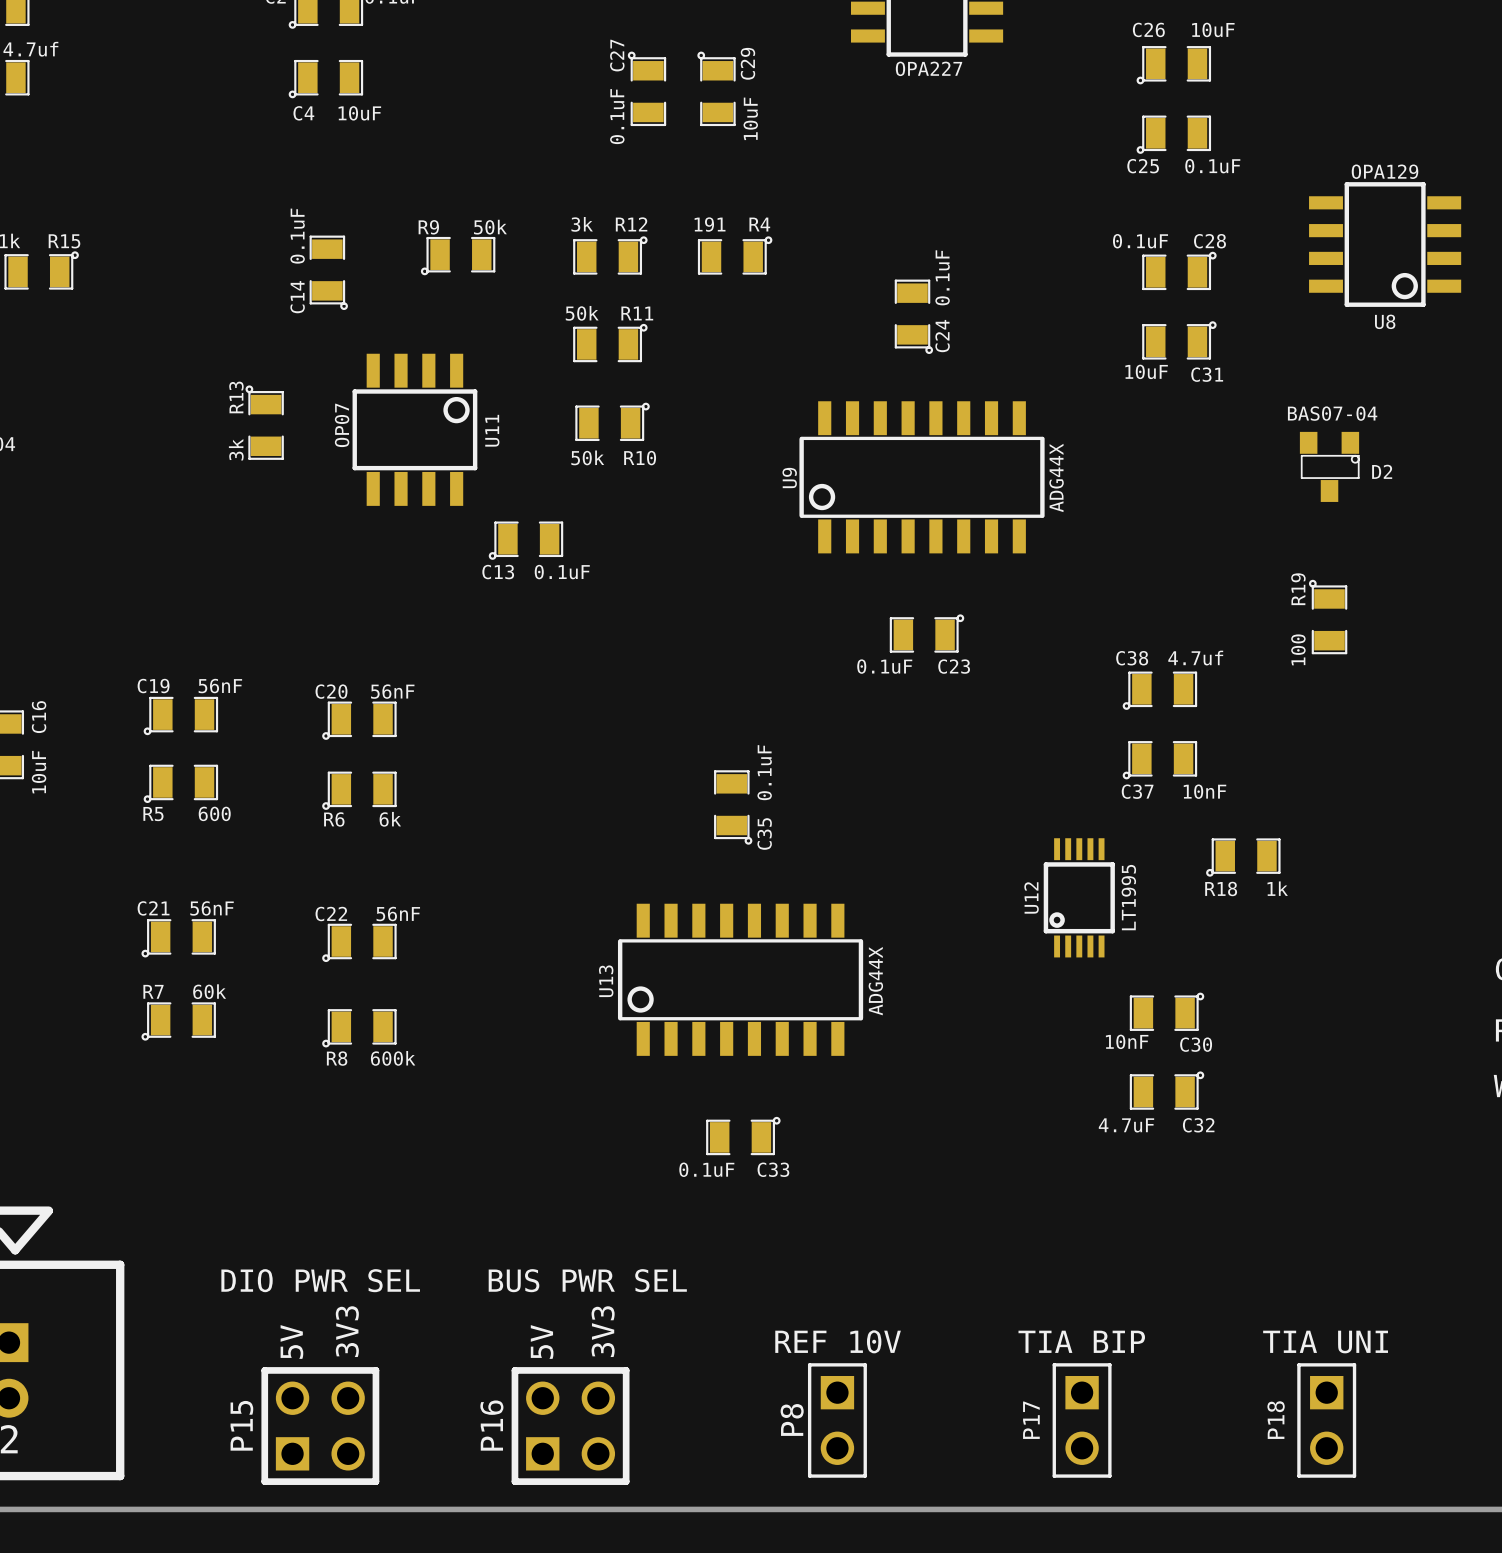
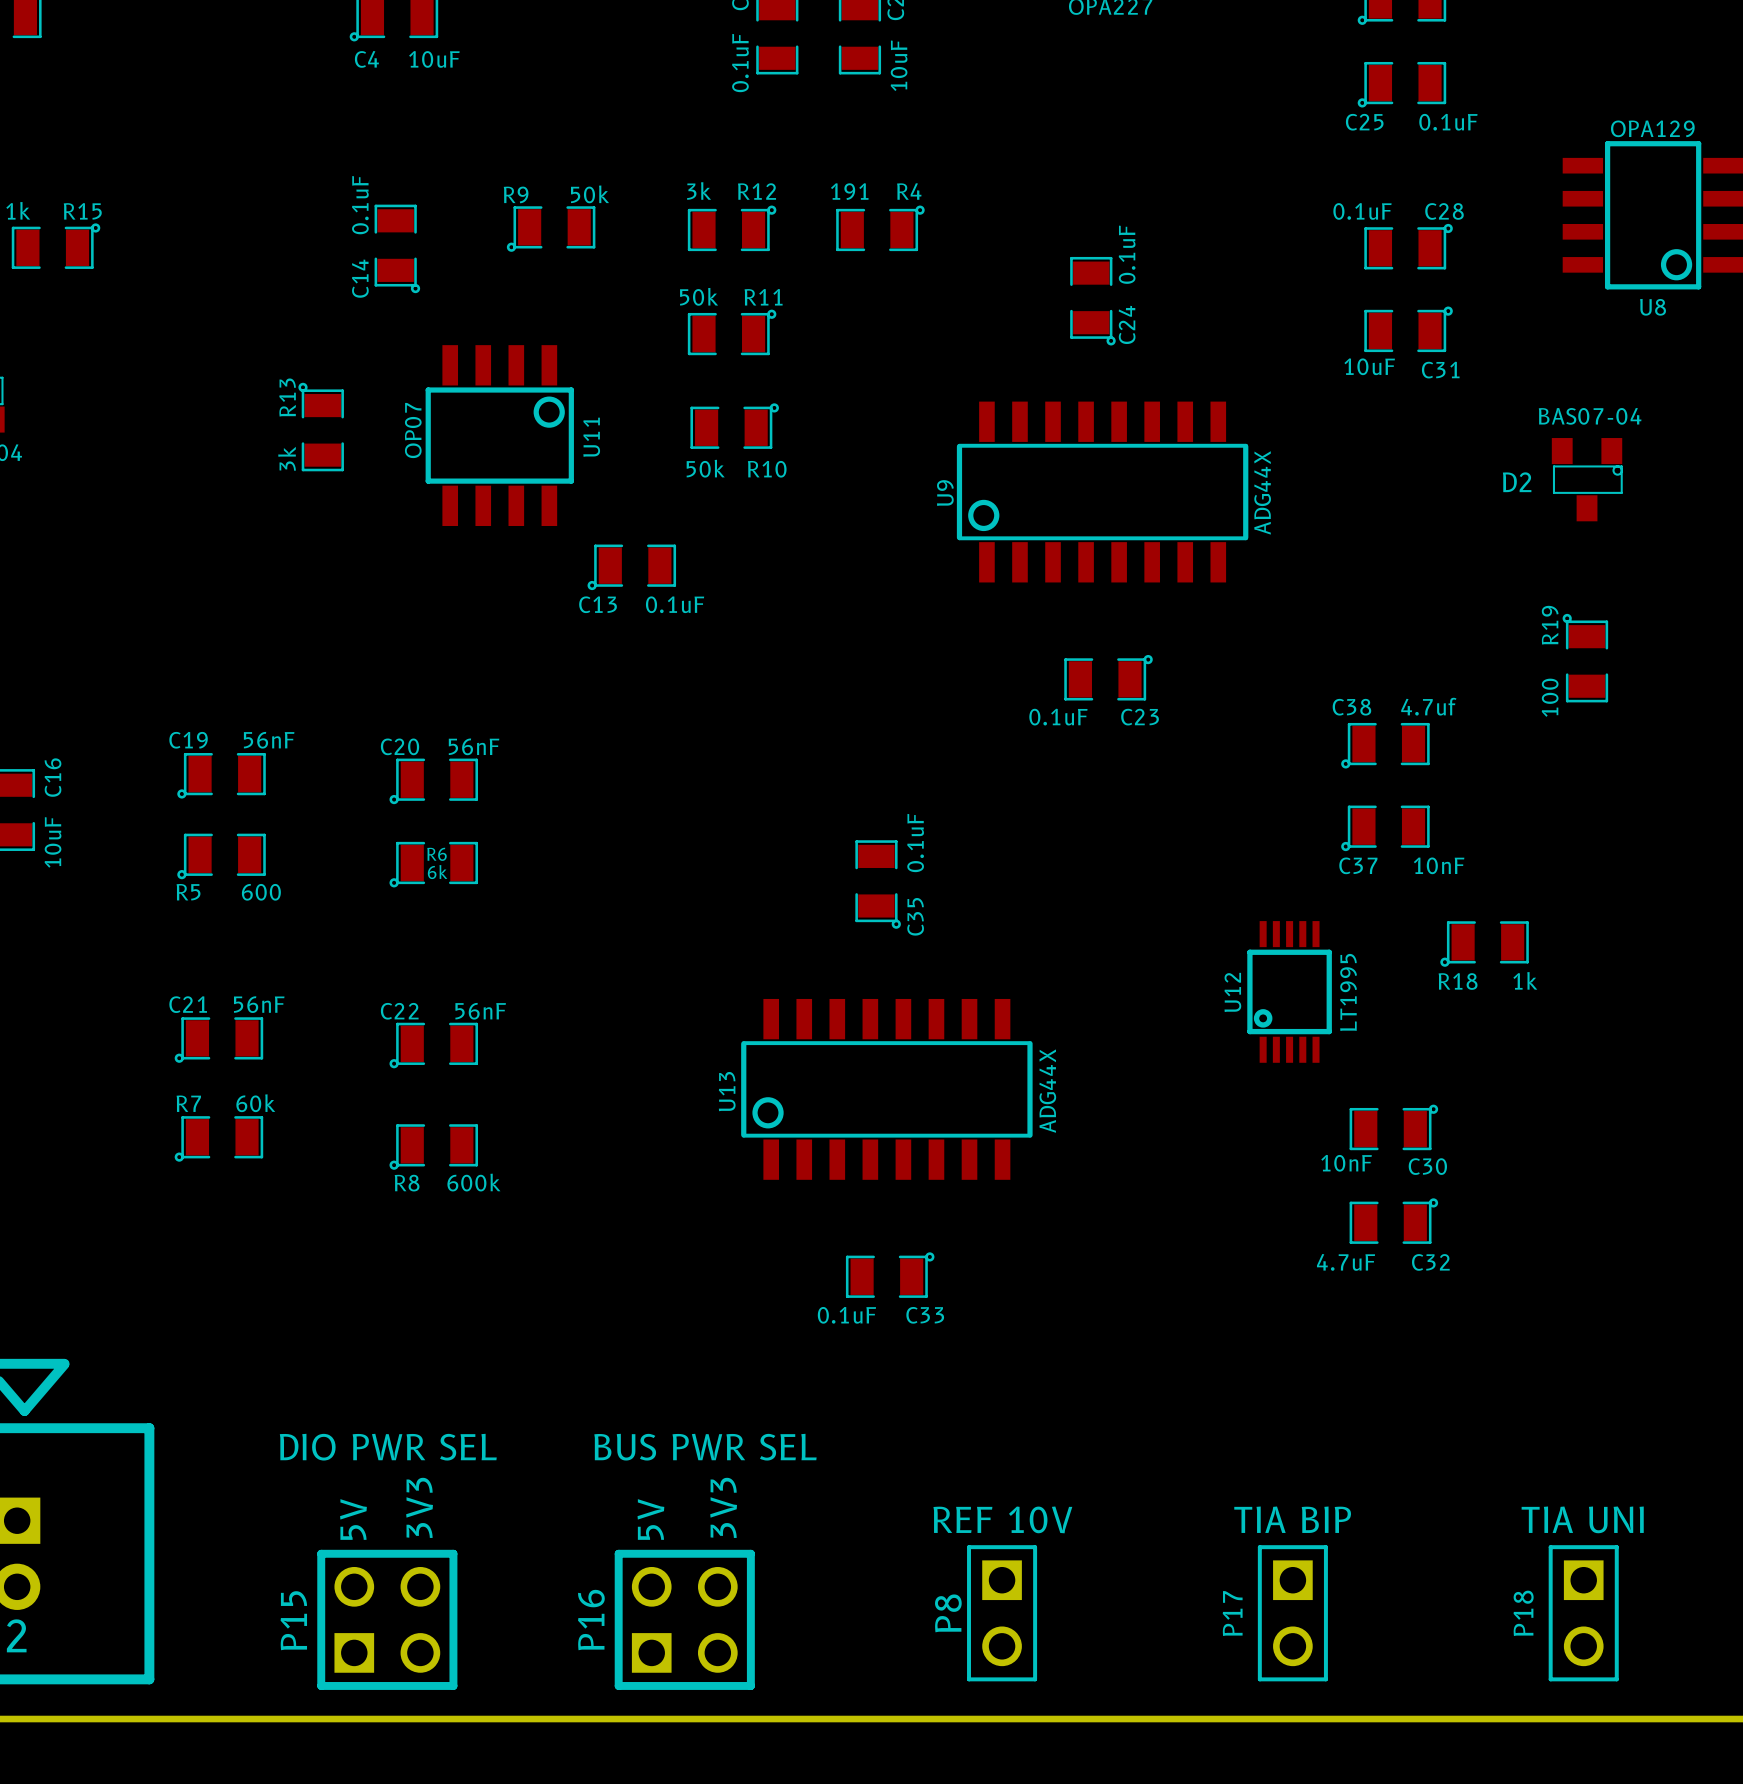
D2 name position: D2 (1382, 471) -> D2 (1517, 482)
R6 name position: R6 (334, 819) -> R6 (436, 854)
R6 value position: 6k (390, 819) -> 6k (437, 872)

